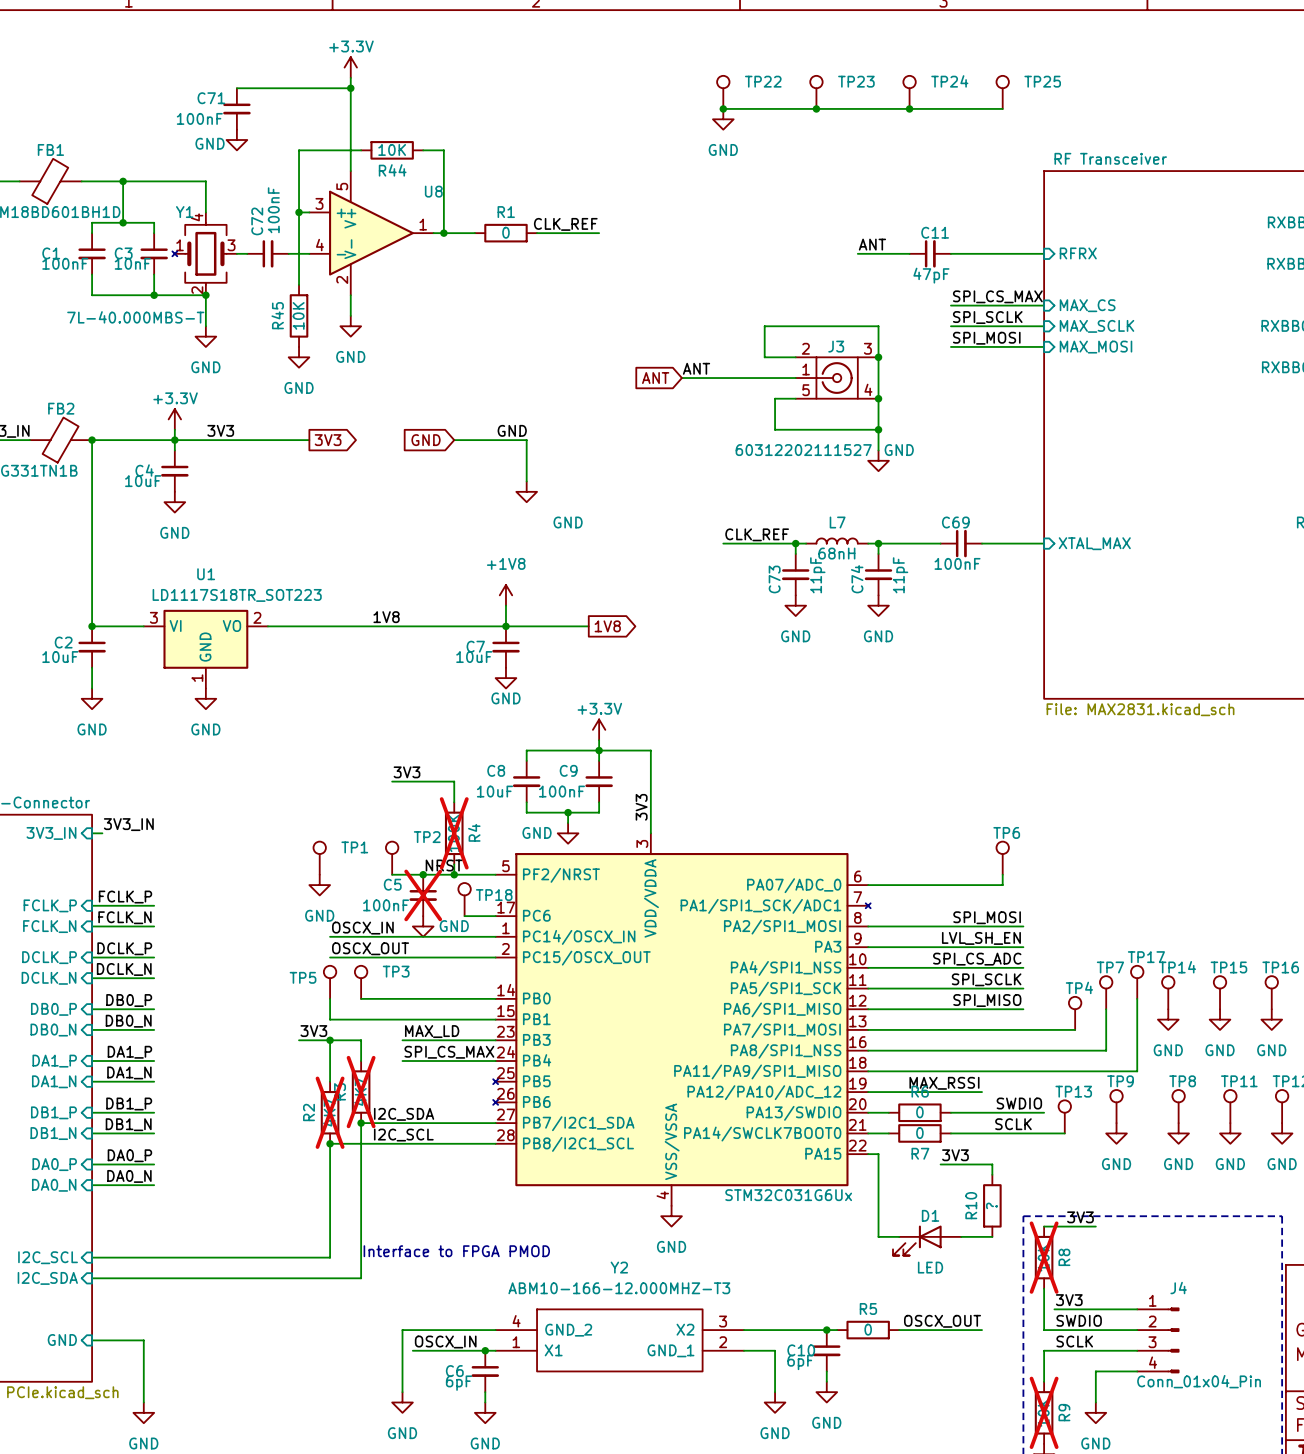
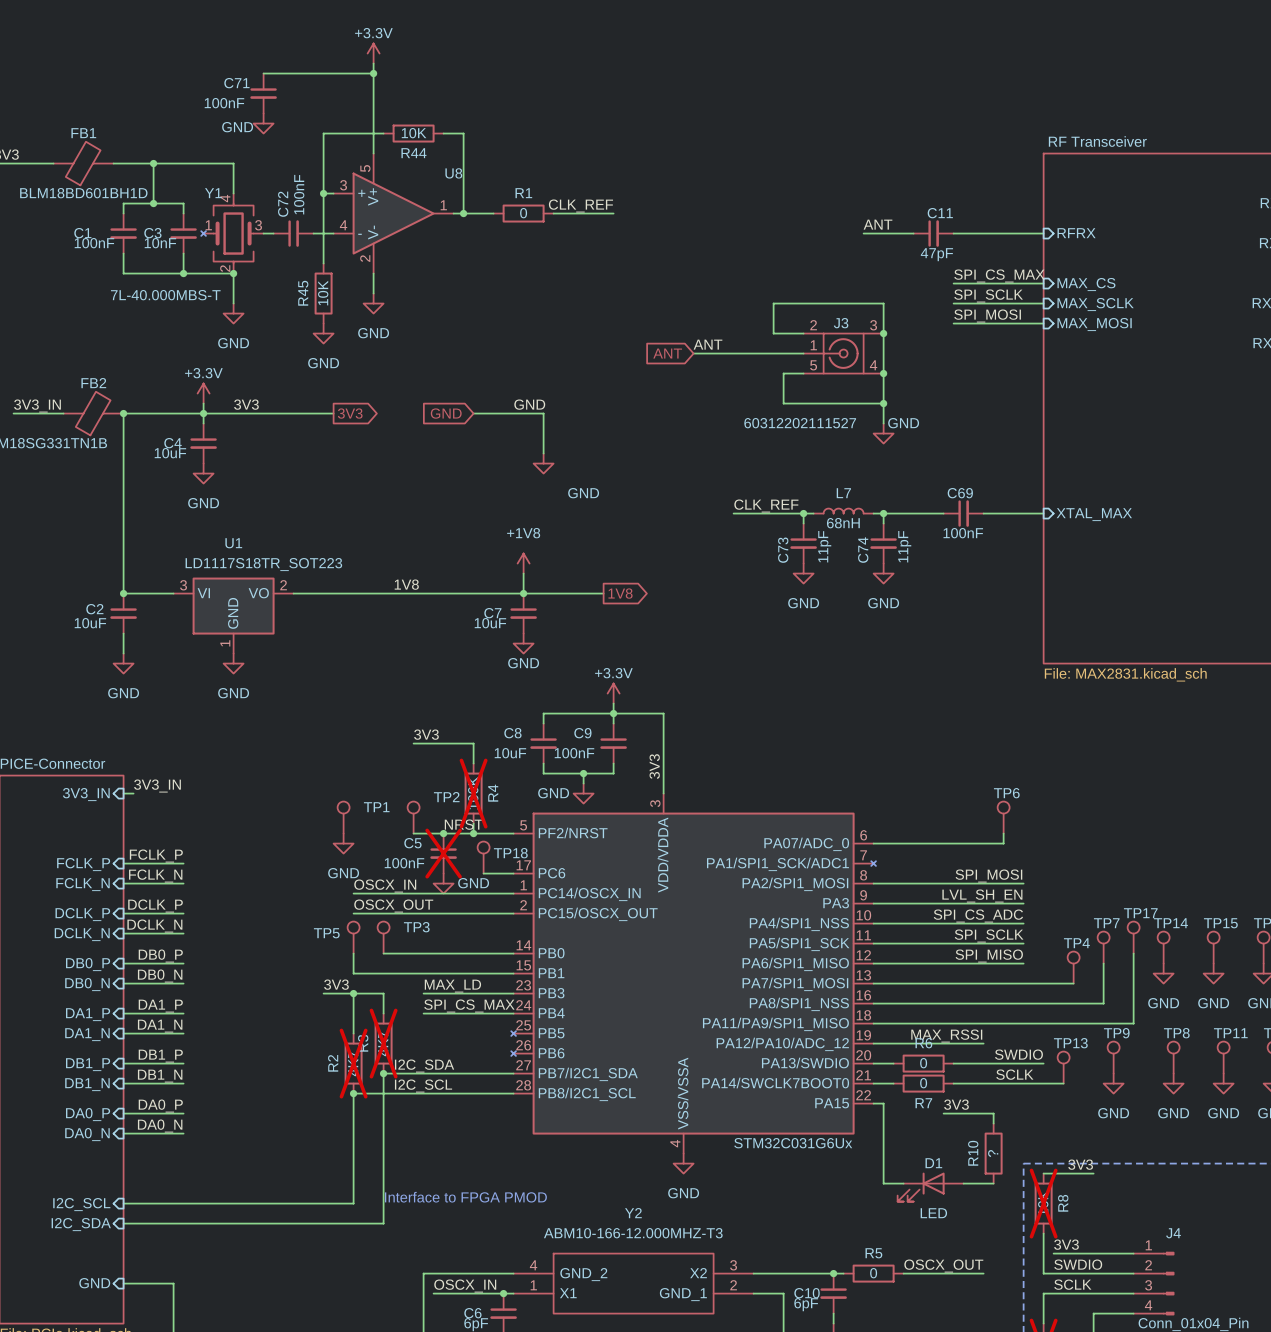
TP22: (723, 92) -> none
TP23: (816, 92) -> none
TP24: (909, 92) -> none
TP25: (1002, 92) -> none
wire: (723, 108) (1002, 108) -> none
junction: (723, 108) -> none
junction: (816, 108) -> none
junction: (909, 108) -> none
power symbol: GND (723, 119) -> none

